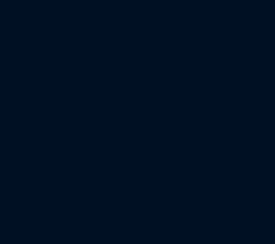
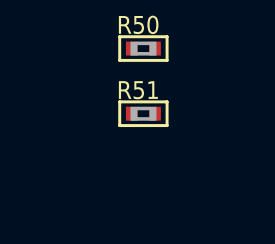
R50: none -> (143, 48)
R51: none -> (143, 113)

